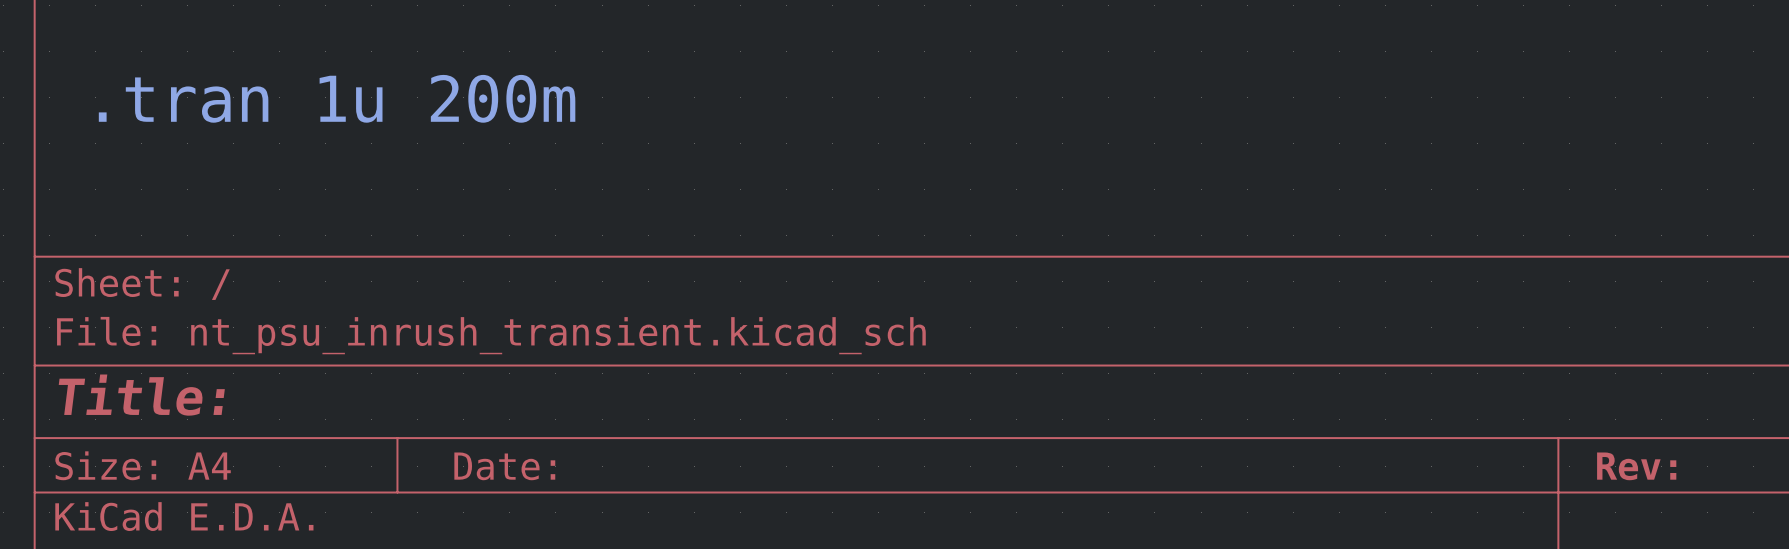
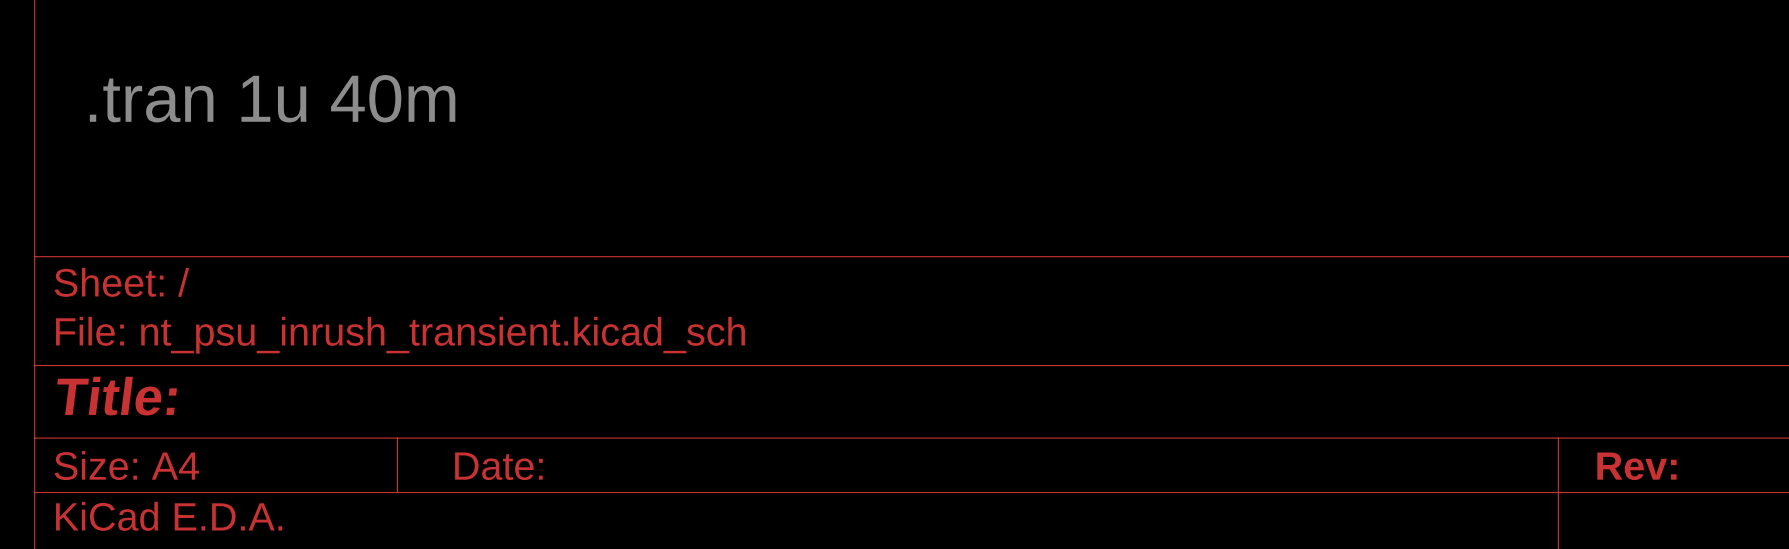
text: .tran 1u 200m (337, 98) -> .tran 1u 40m (272, 98)

